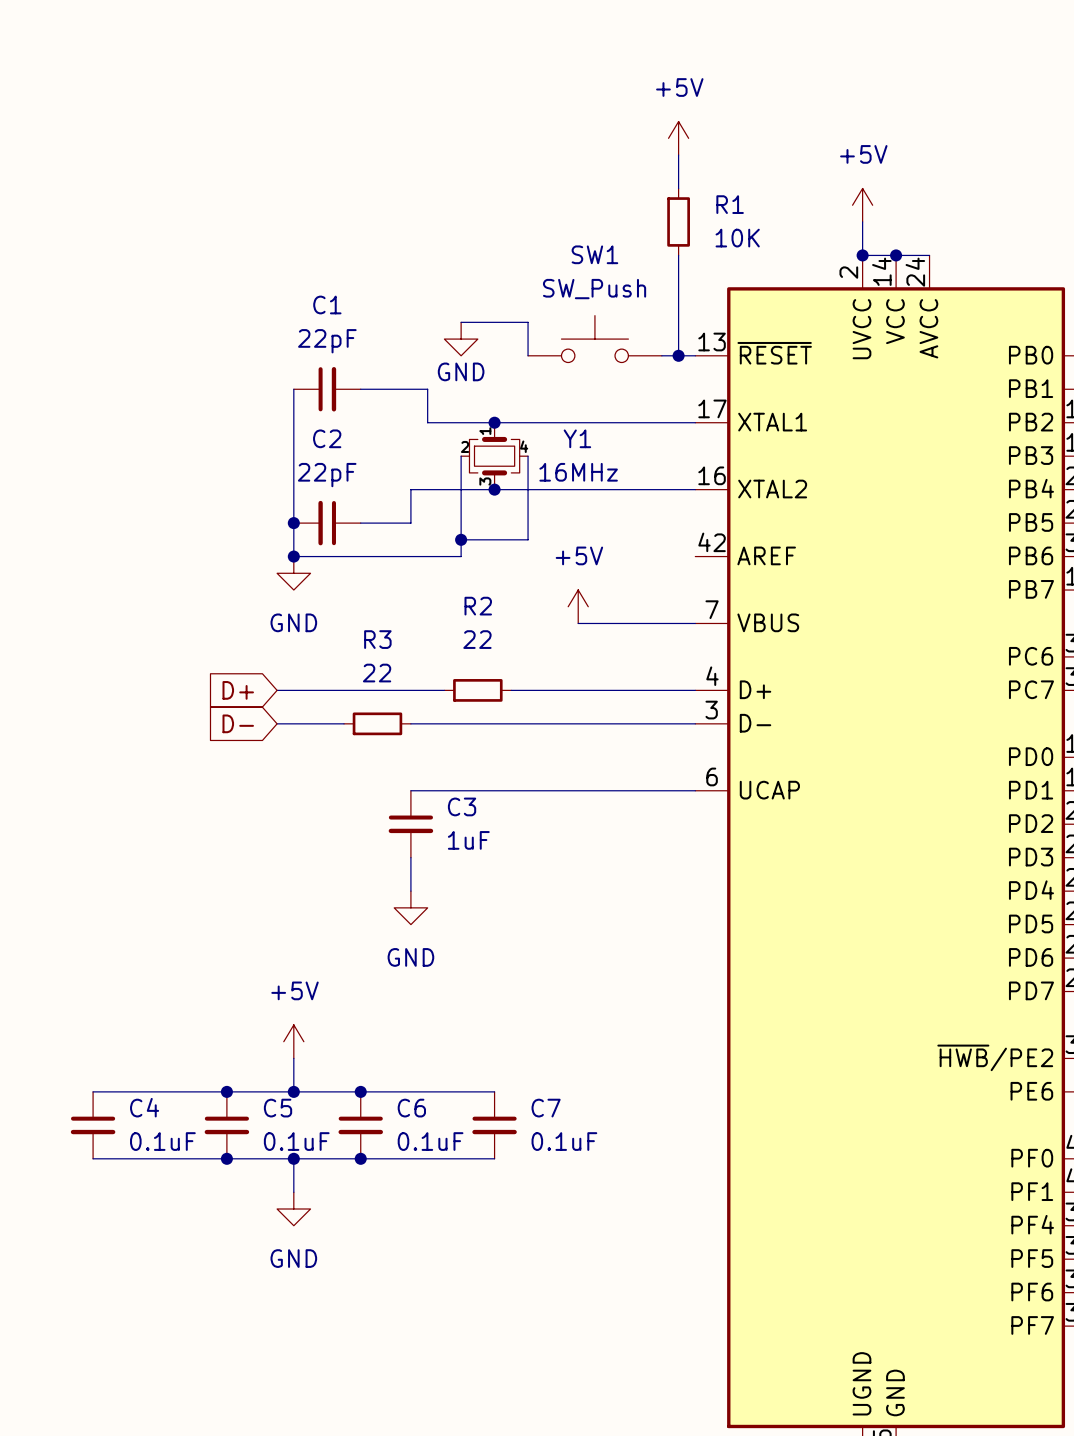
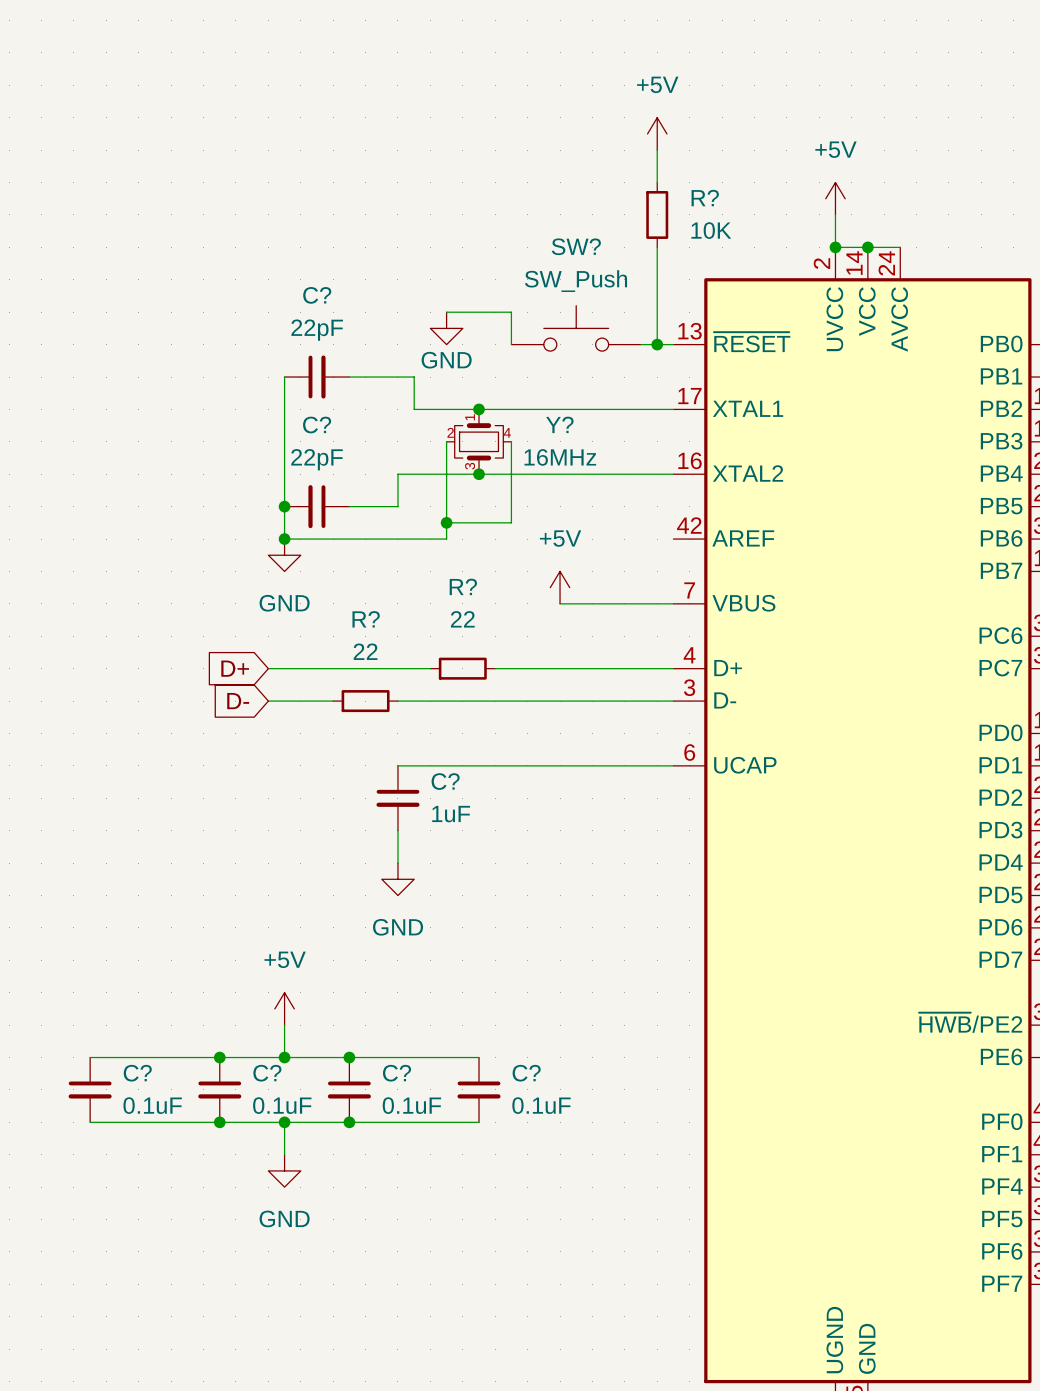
R1 name: R1 (730, 204) -> R? (705, 198)
SW1 name: SW1 (594, 254) -> SW? (576, 246)
C1 name: C1 (327, 304) -> C? (317, 295)
C2 name: C2 (327, 438) -> C? (317, 425)
Y1 name: Y1 (577, 438) -> Y? (559, 424)
R2 name: R2 (478, 606) -> R? (463, 586)
R3 name: R3 (377, 639) -> R? (366, 619)
C3 name: C3 (462, 806) -> C? (445, 781)
C4 name: C4 (144, 1107) -> C? (137, 1073)
C5 name: C5 (278, 1108) -> C? (267, 1073)
C6 name: C6 (411, 1108) -> C? (397, 1073)
C7 name: C7 (546, 1108) -> C? (526, 1073)

